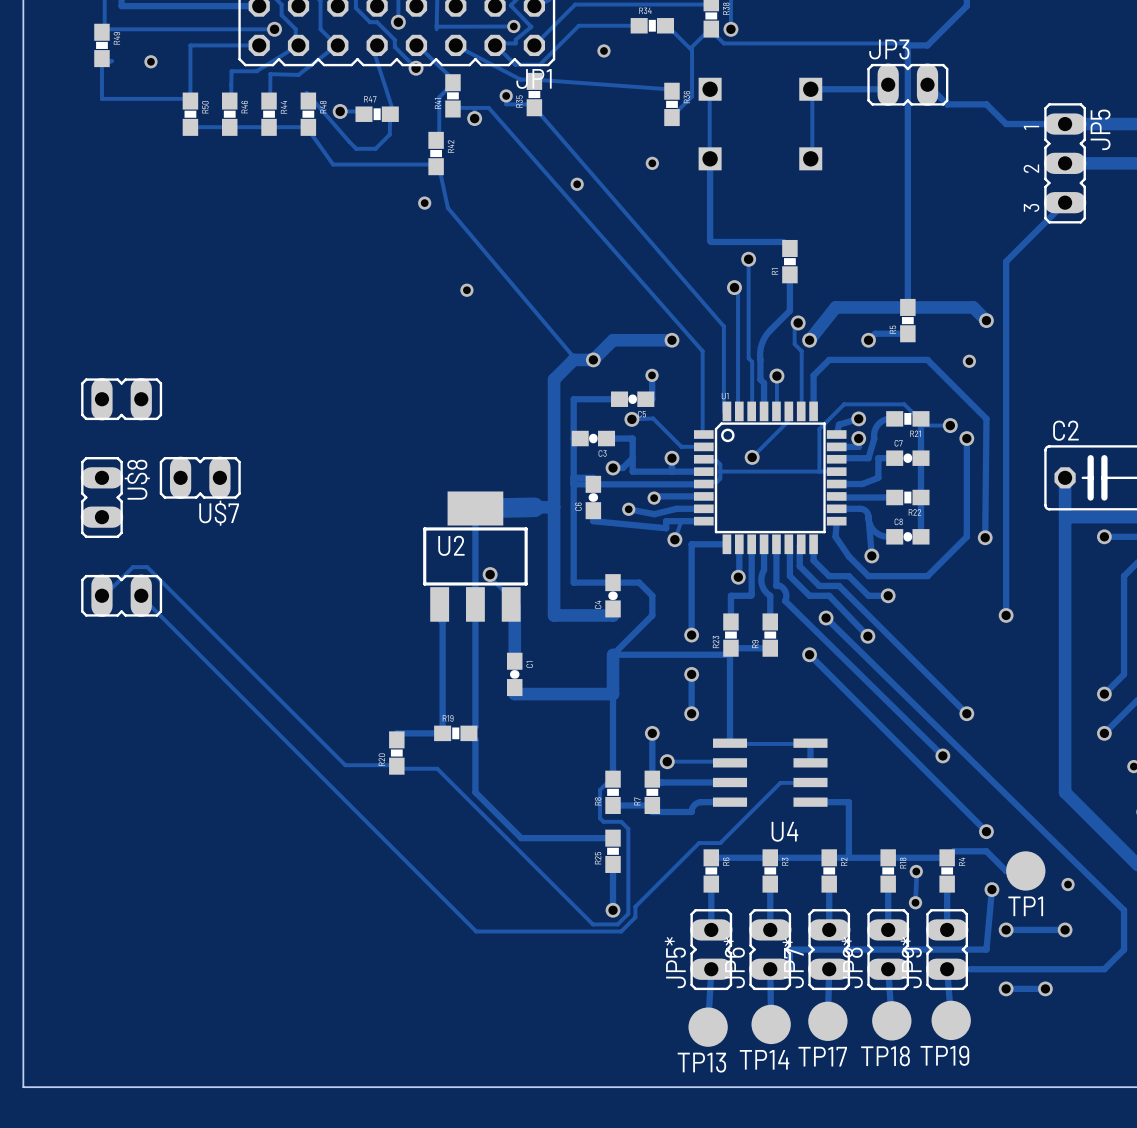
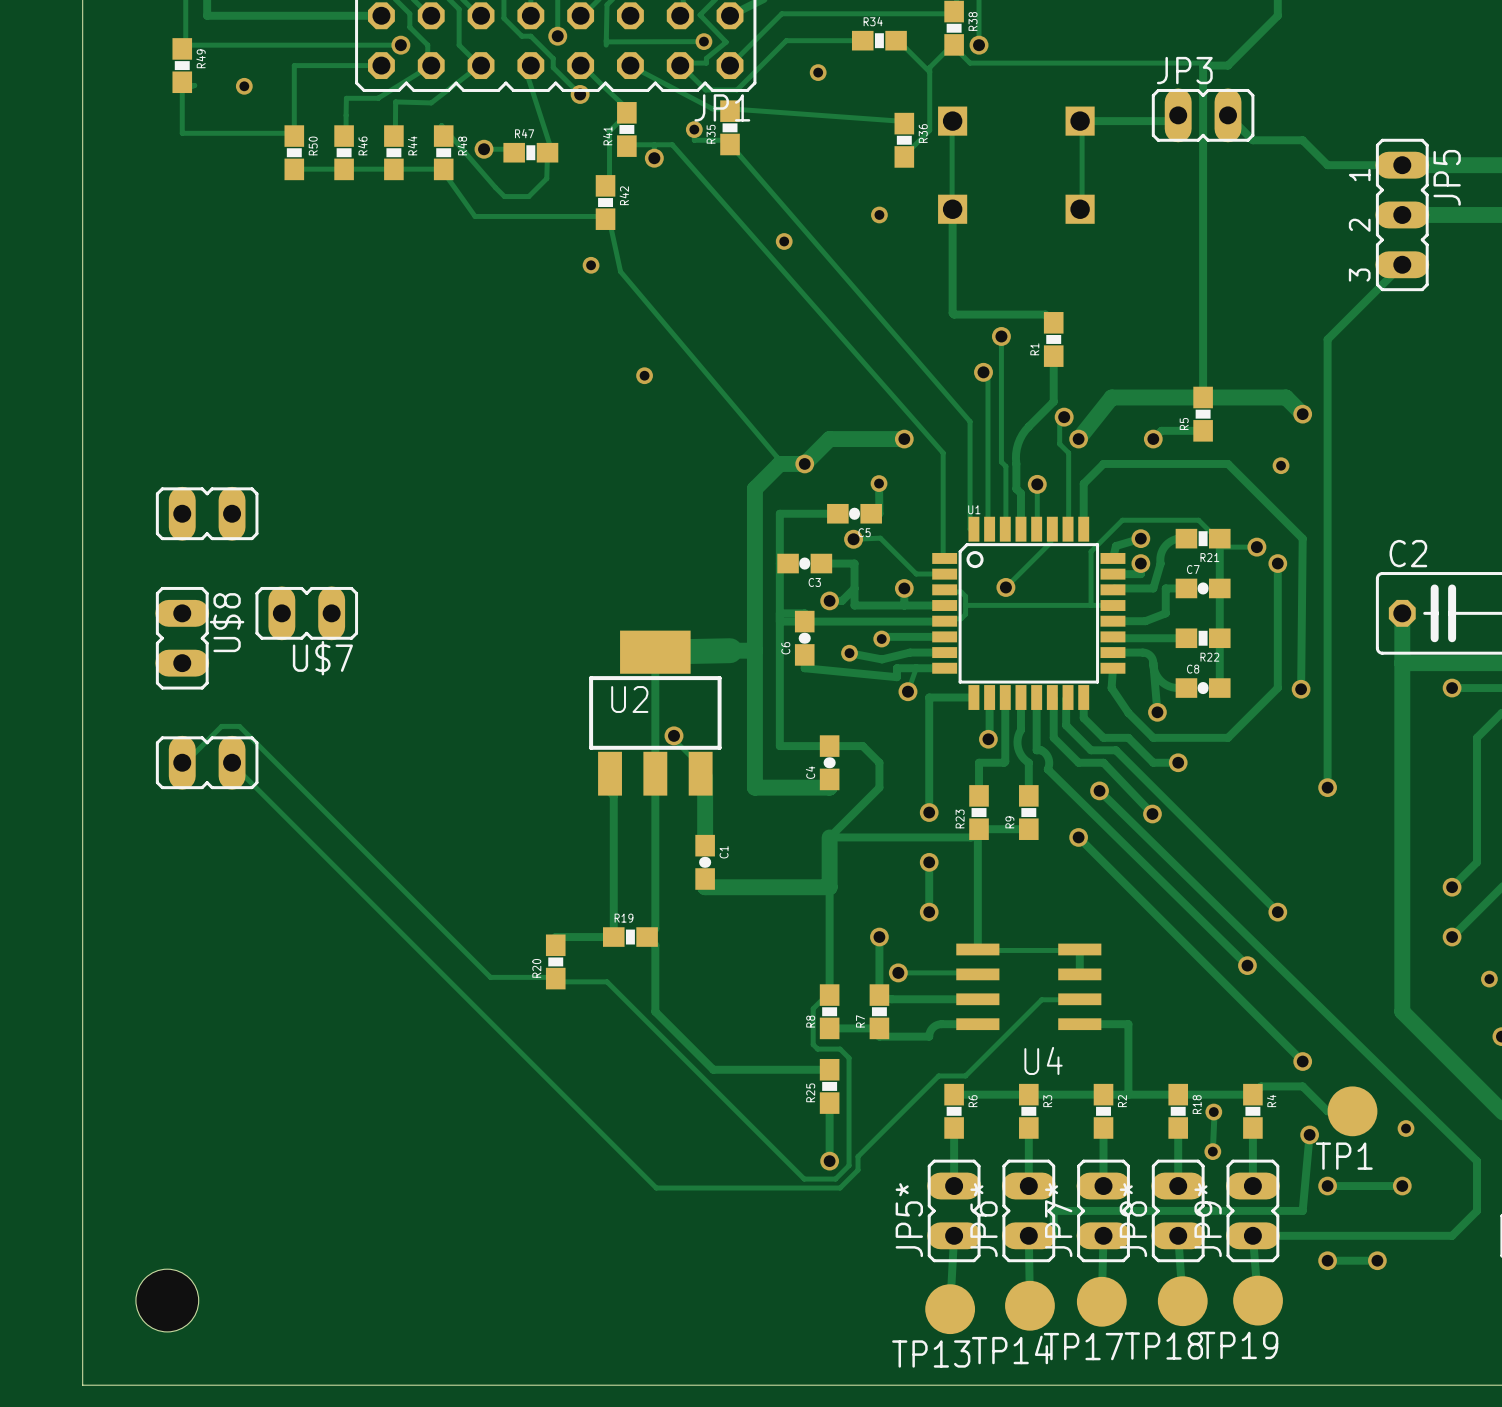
hole: none -> (167, 1300)

